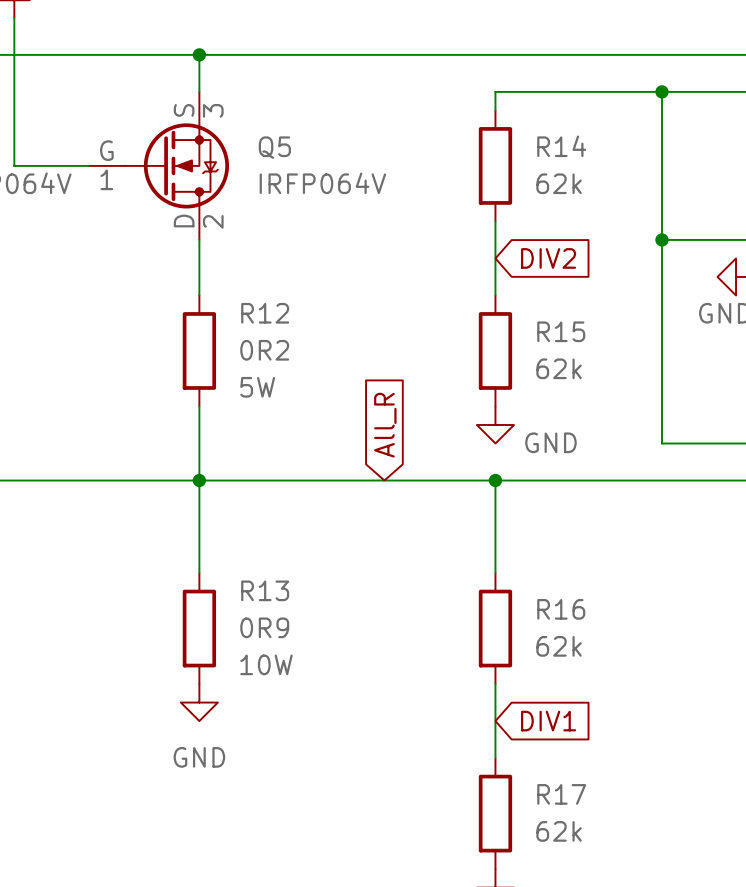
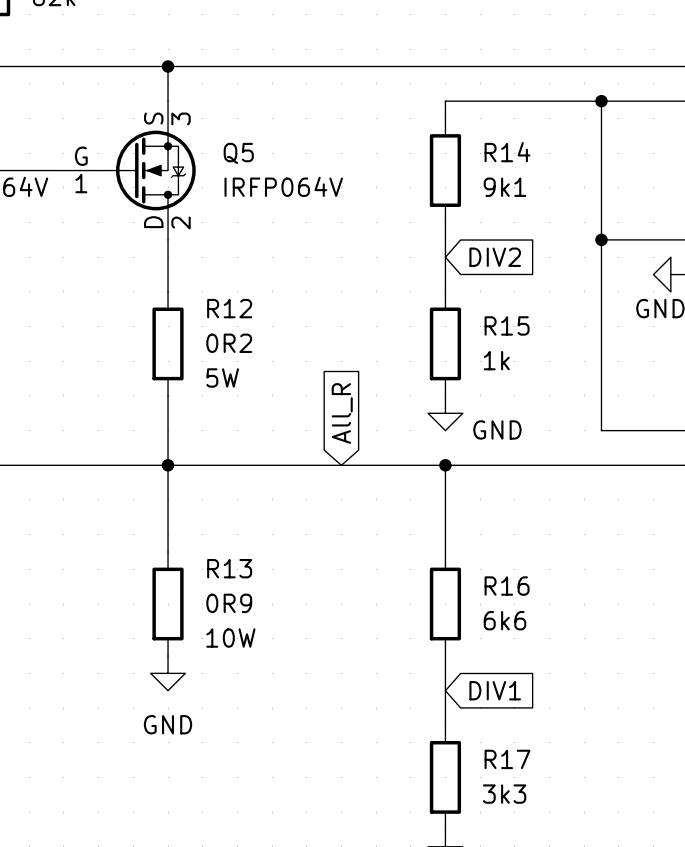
R14 value: 62k (559, 183) -> 9k1 (505, 187)
R15 value: 62k (559, 368) -> 1k (496, 360)
R16 value: 62k (559, 646) -> 6k6 (505, 620)
R17 value: 62k (559, 831) -> 3k3 (504, 794)

